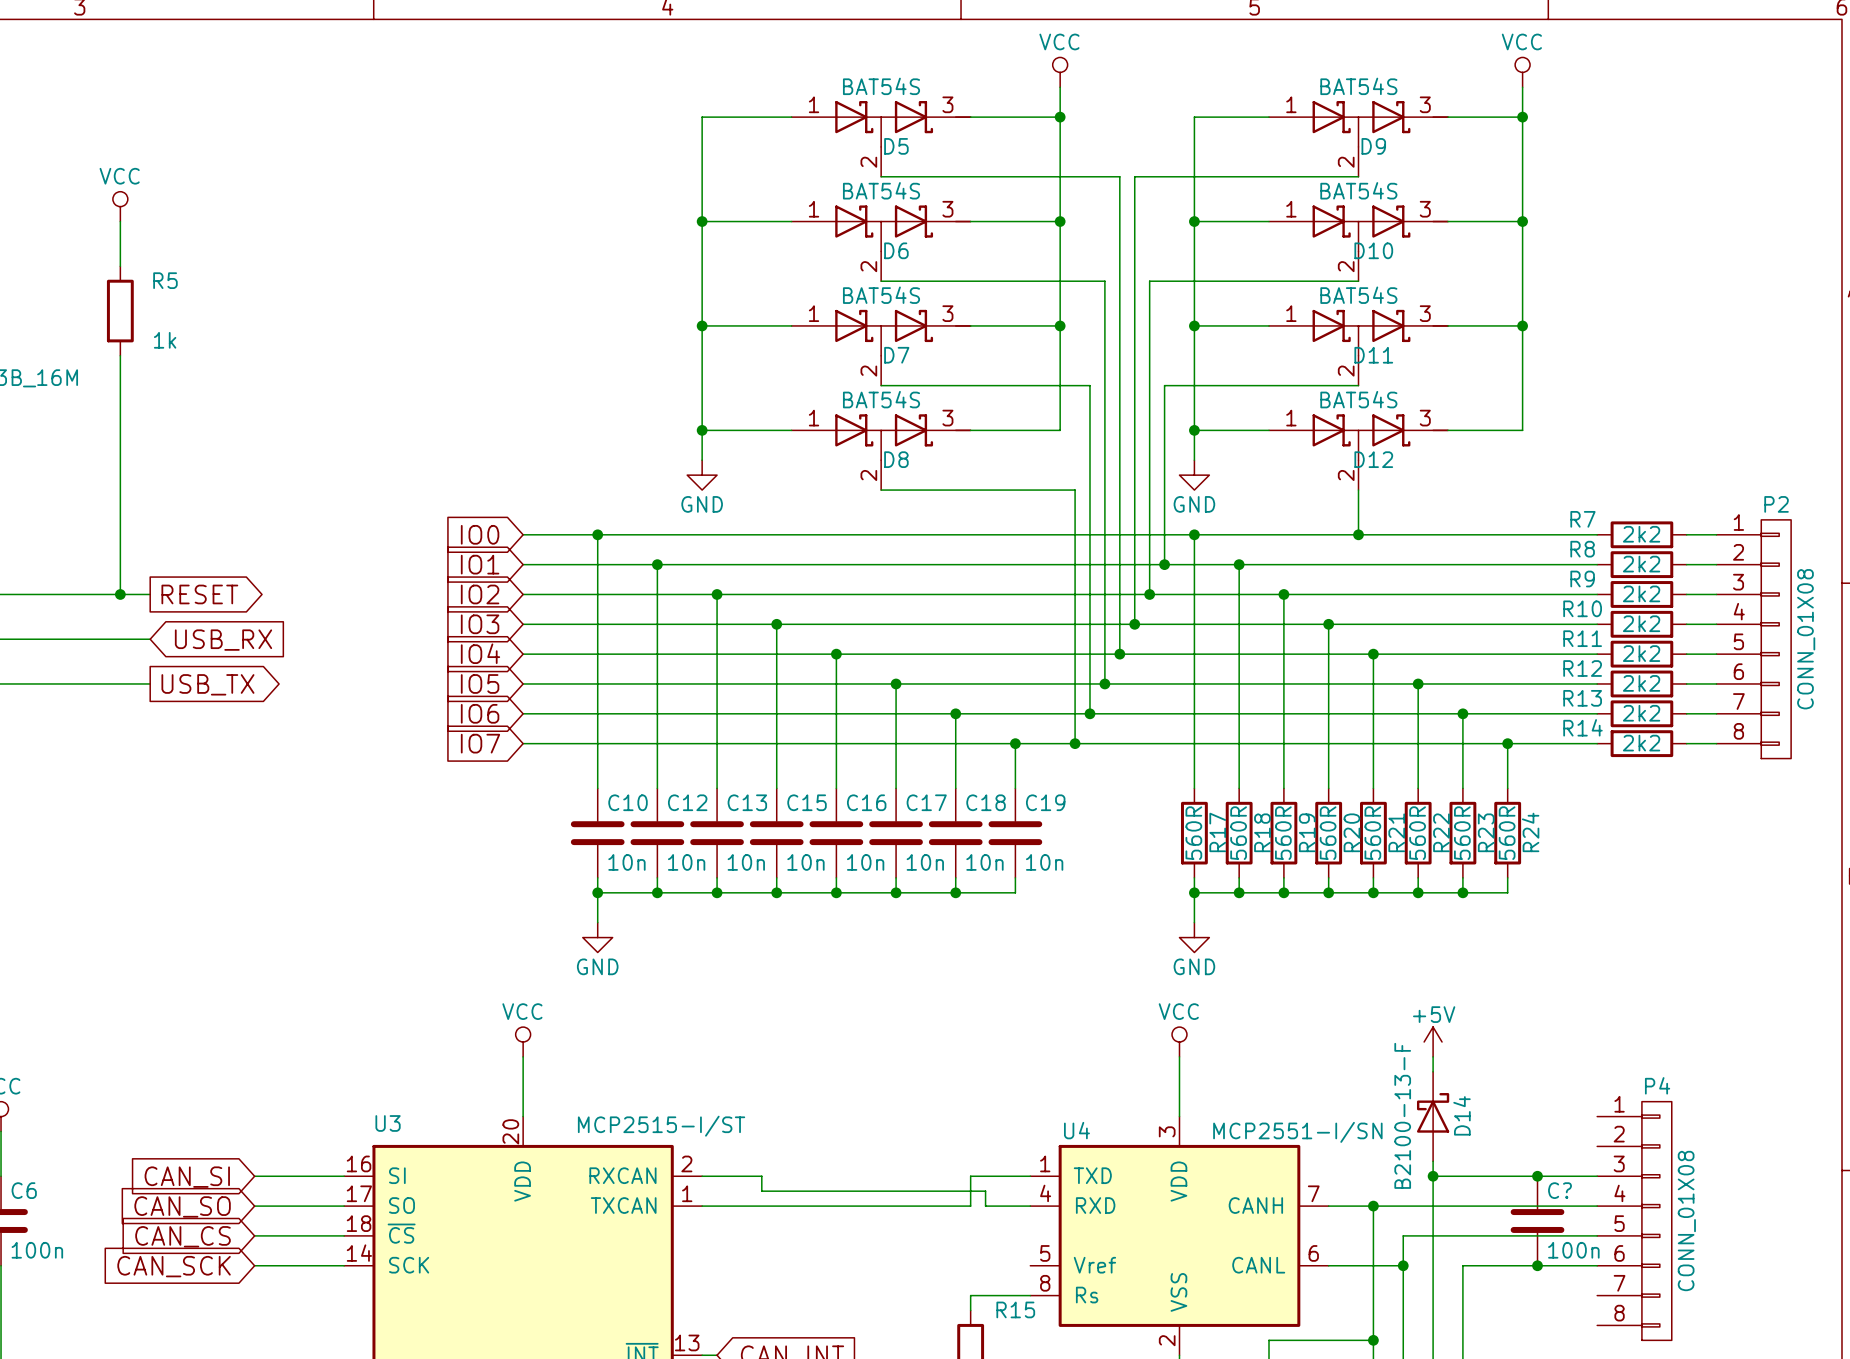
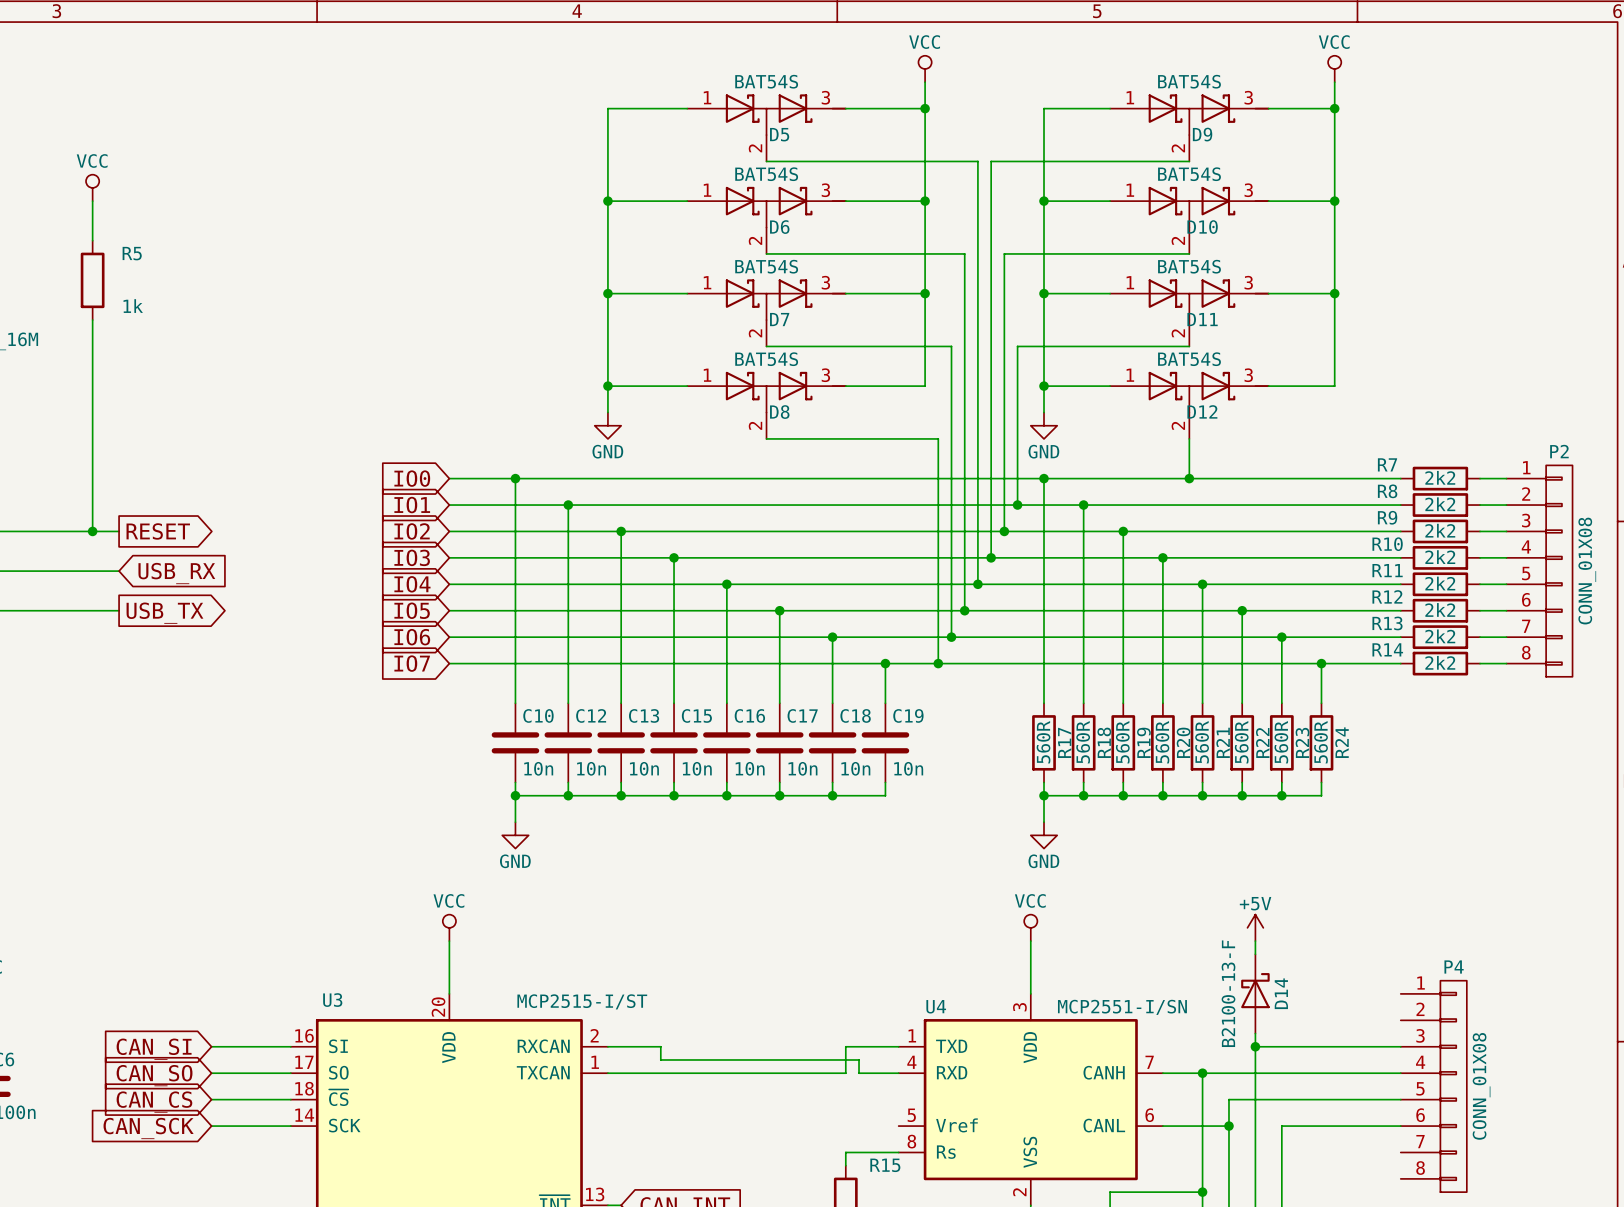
junction: (1537, 1176) -> none
C?: 100n (1537, 1221) -> none
junction: (1537, 1265) -> none

